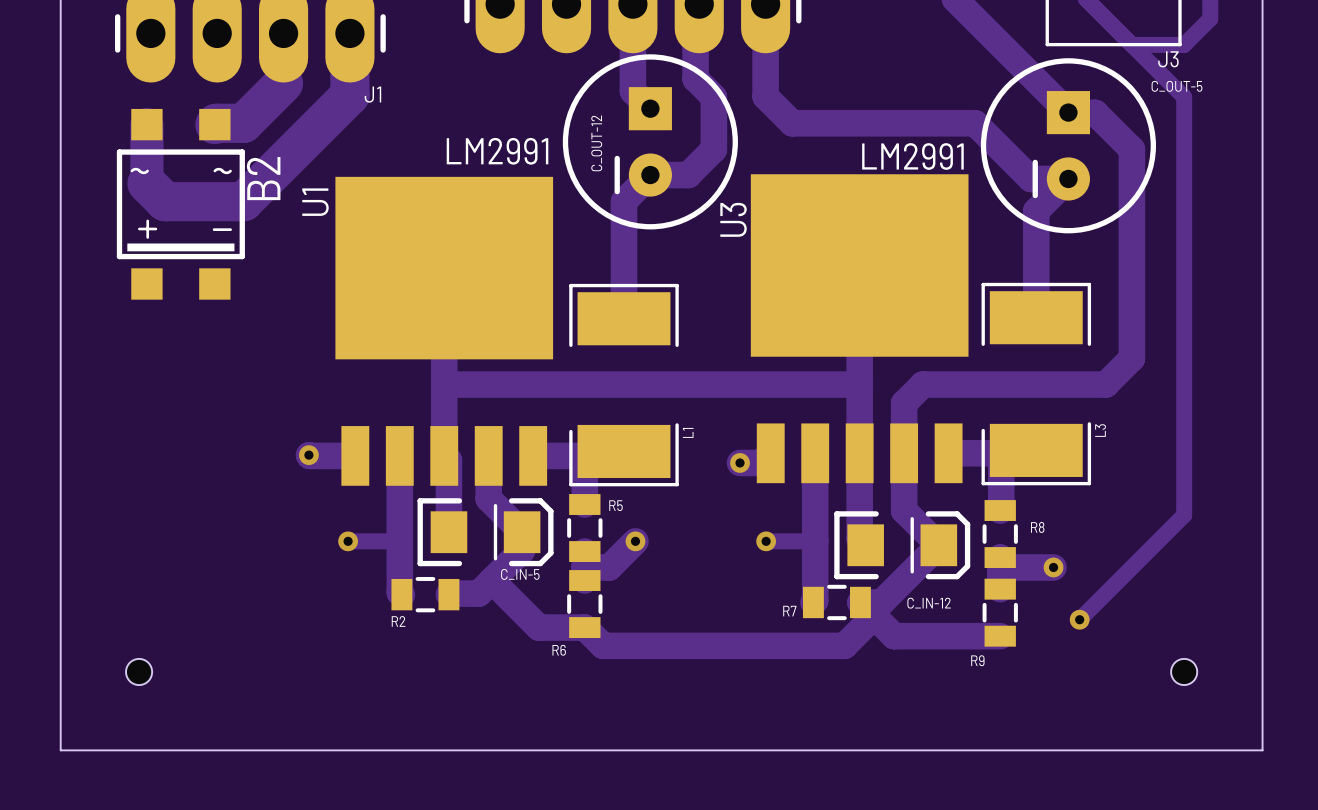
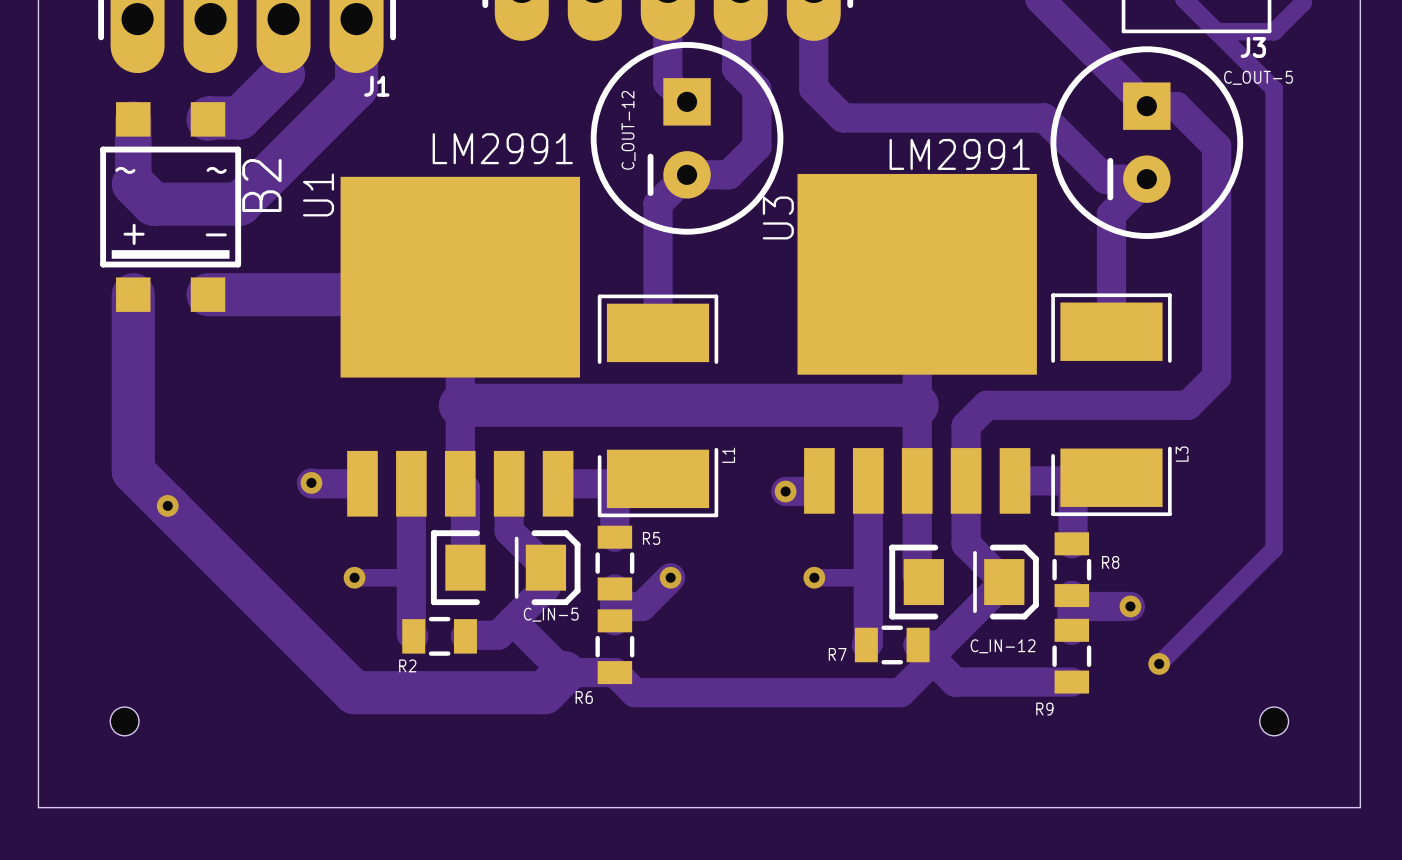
track: none -> (133, 294) (133, 471) (354, 692) (544, 692) (564, 672)
track: none -> (207, 294) (435, 294) (460, 319)
track width: thin (444, 384) (859, 384) -> thick (460, 405) (917, 405)
via: none -> (167, 505)

